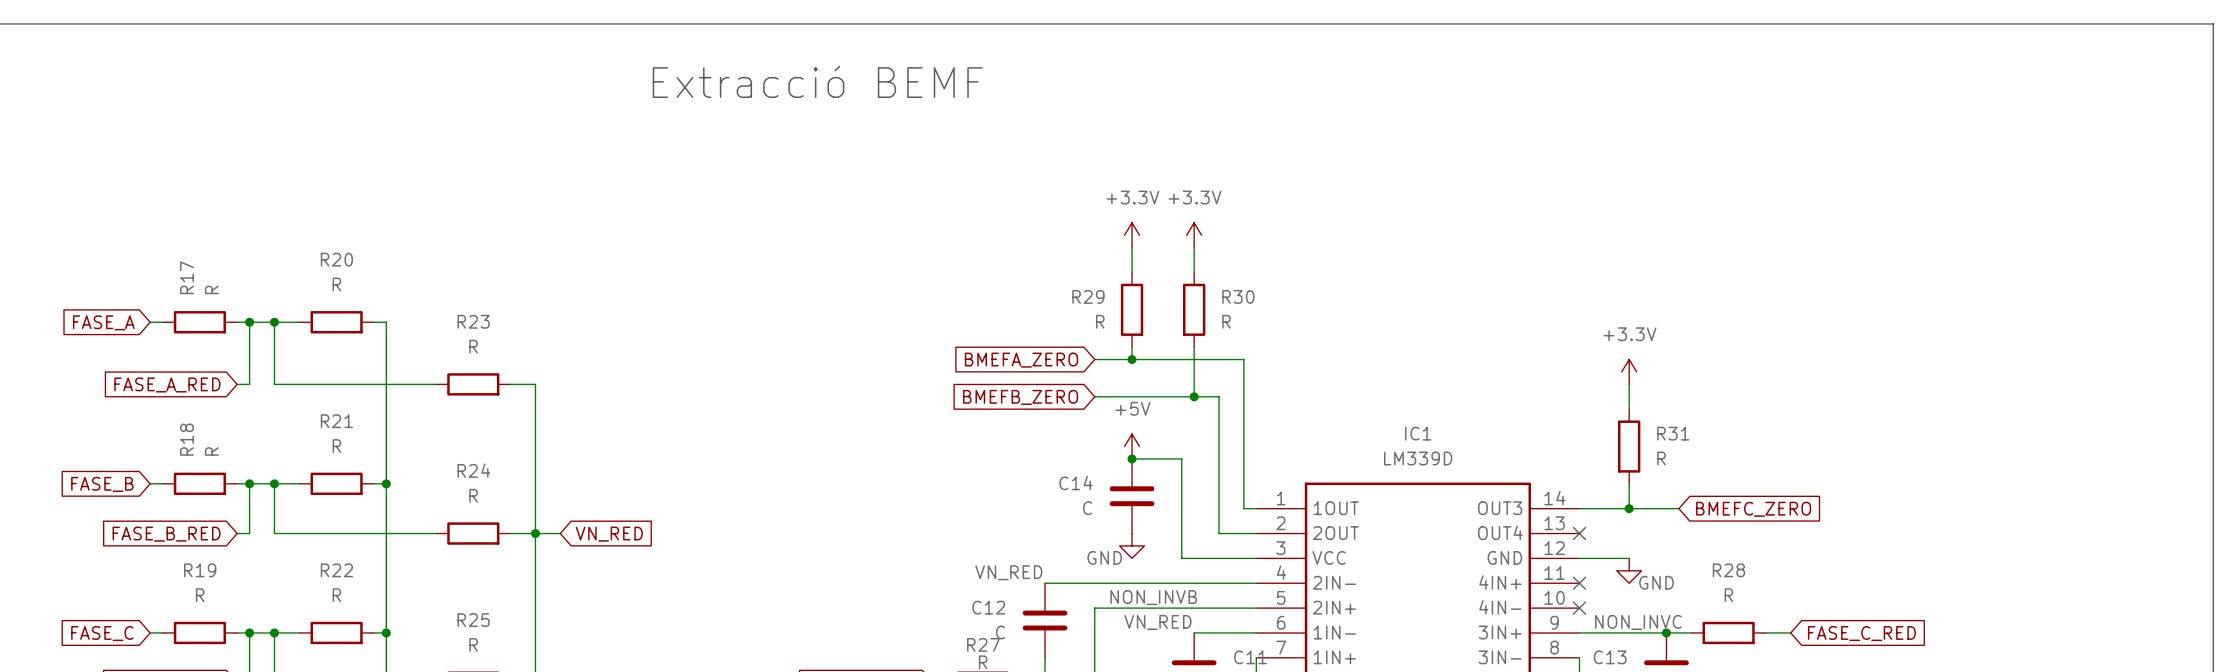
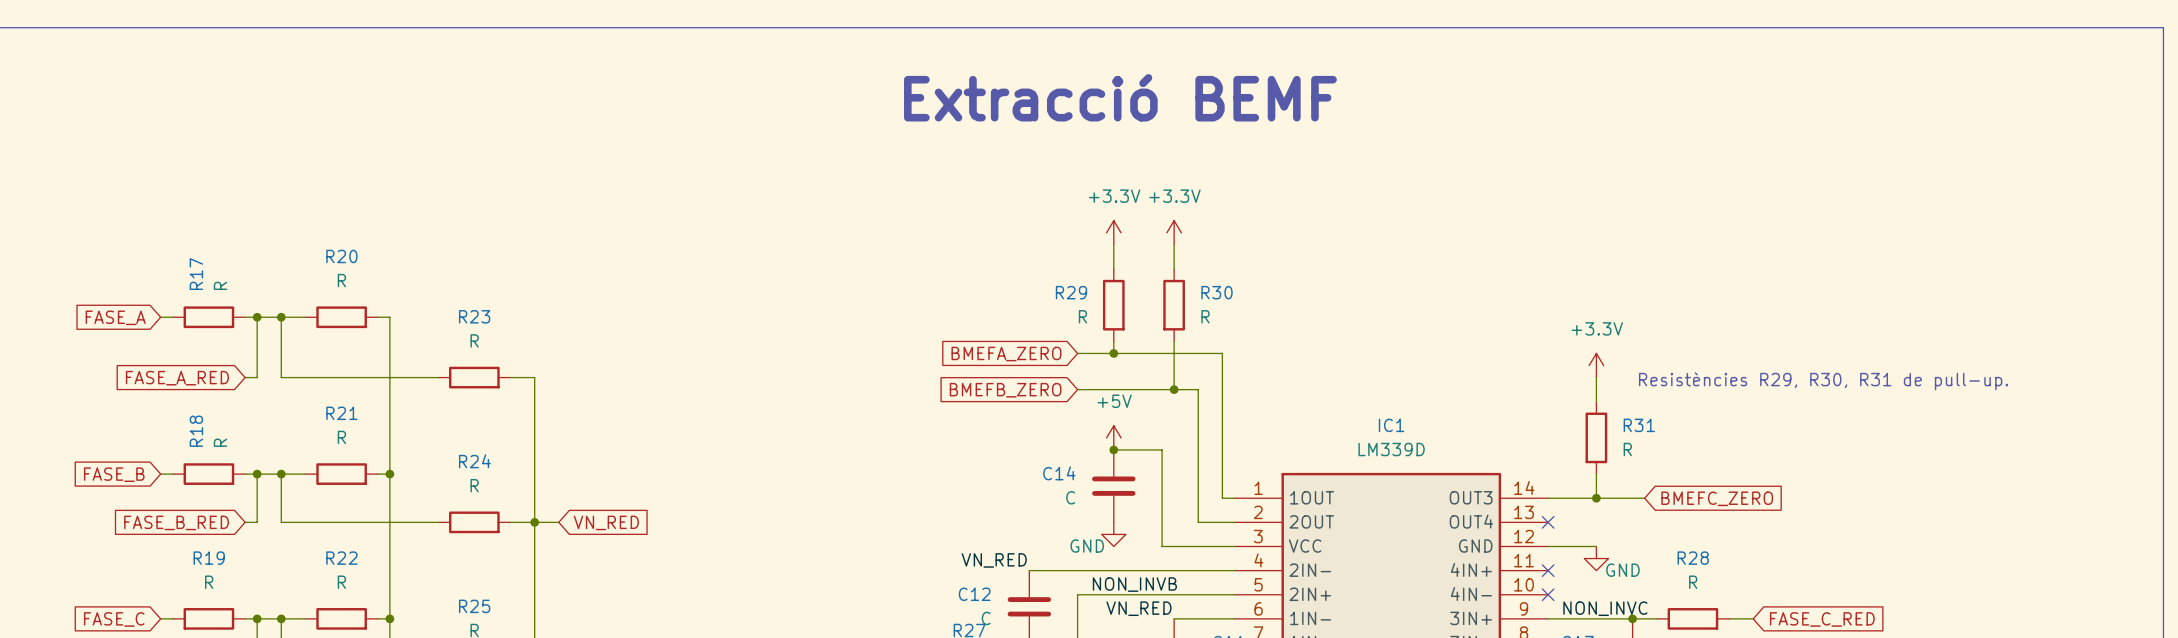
text: Extracció BEMF (817, 81) -> none
text: none -> Extracció BEMF (1120, 97)
text: none -> Resistències R29, R30, R31 de pull-up. (1823, 381)

